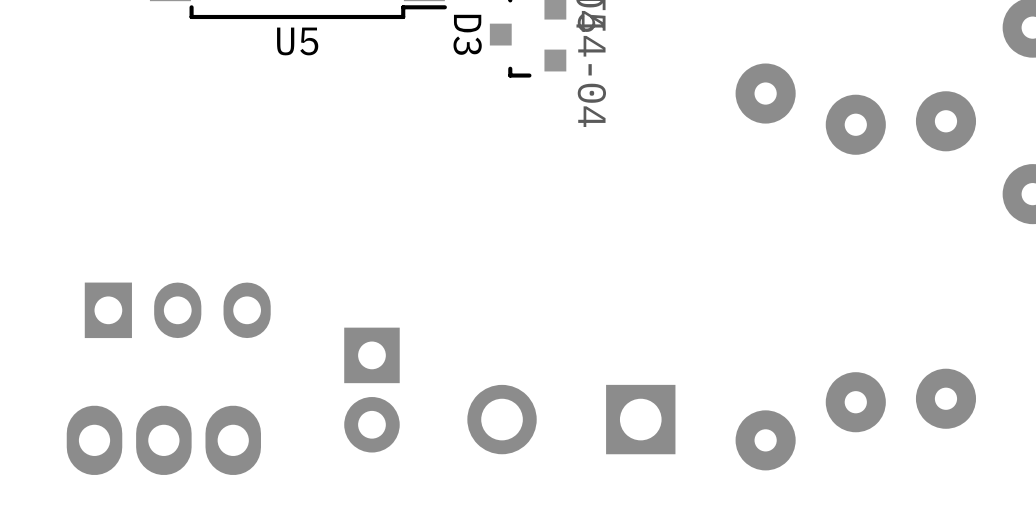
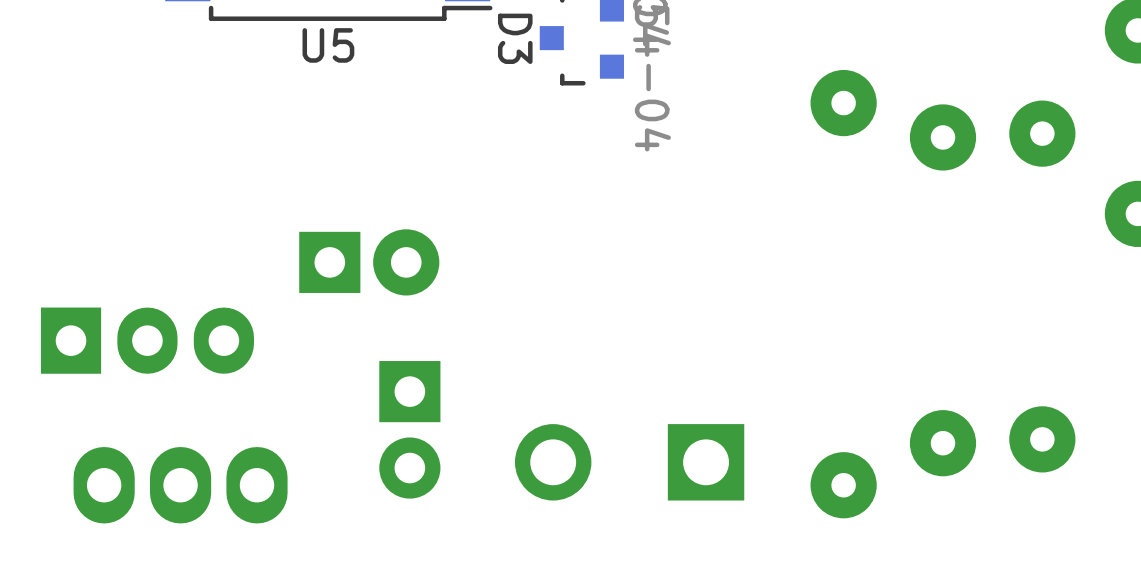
part: none -> (369, 262)
part: none -> (147, 340)
part: (177, 310) -> none

